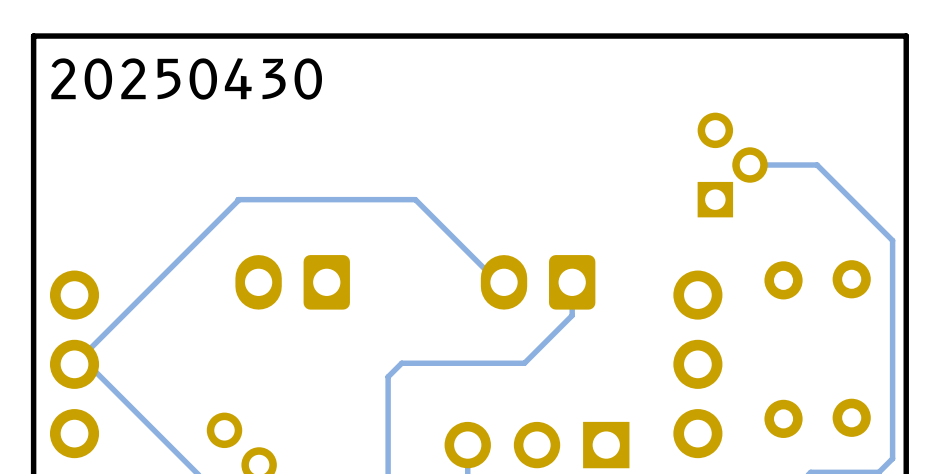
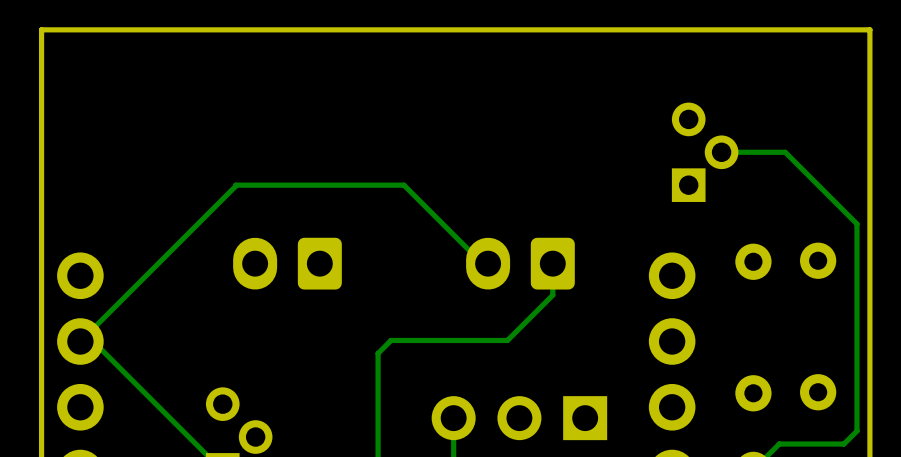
text: 20250430 (186, 78) -> none

